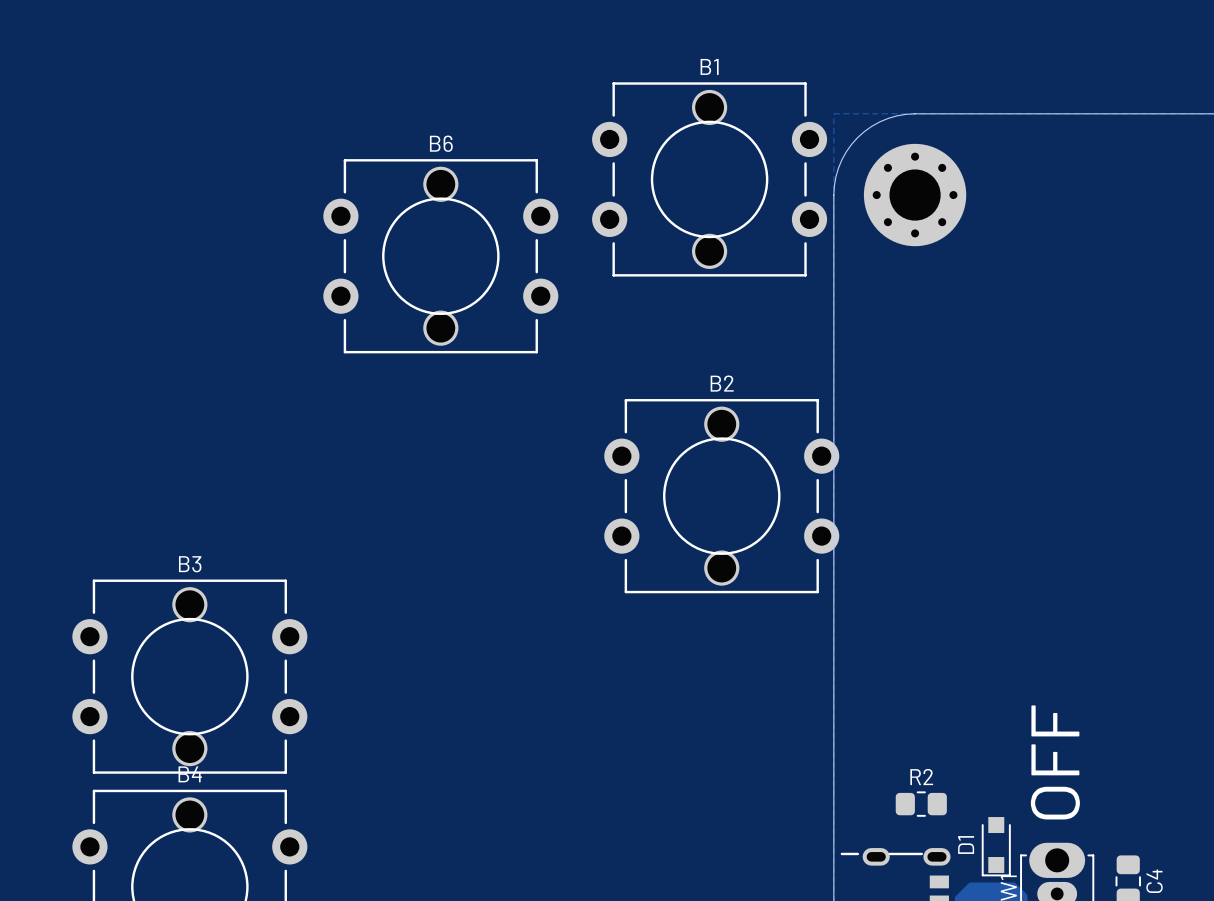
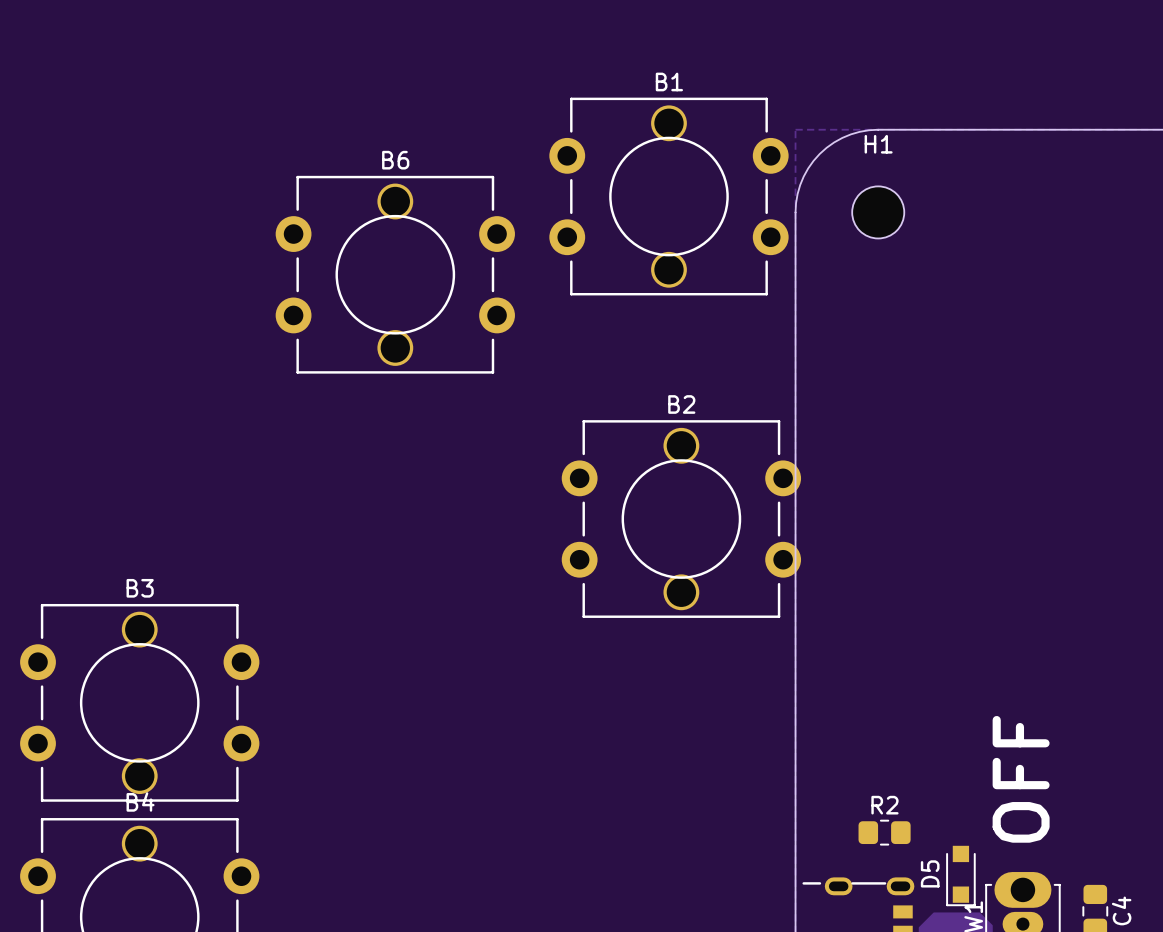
part: (915, 195) -> none
H1: none -> (878, 212)
D1 name: D1 (966, 845) -> D5 (930, 873)

